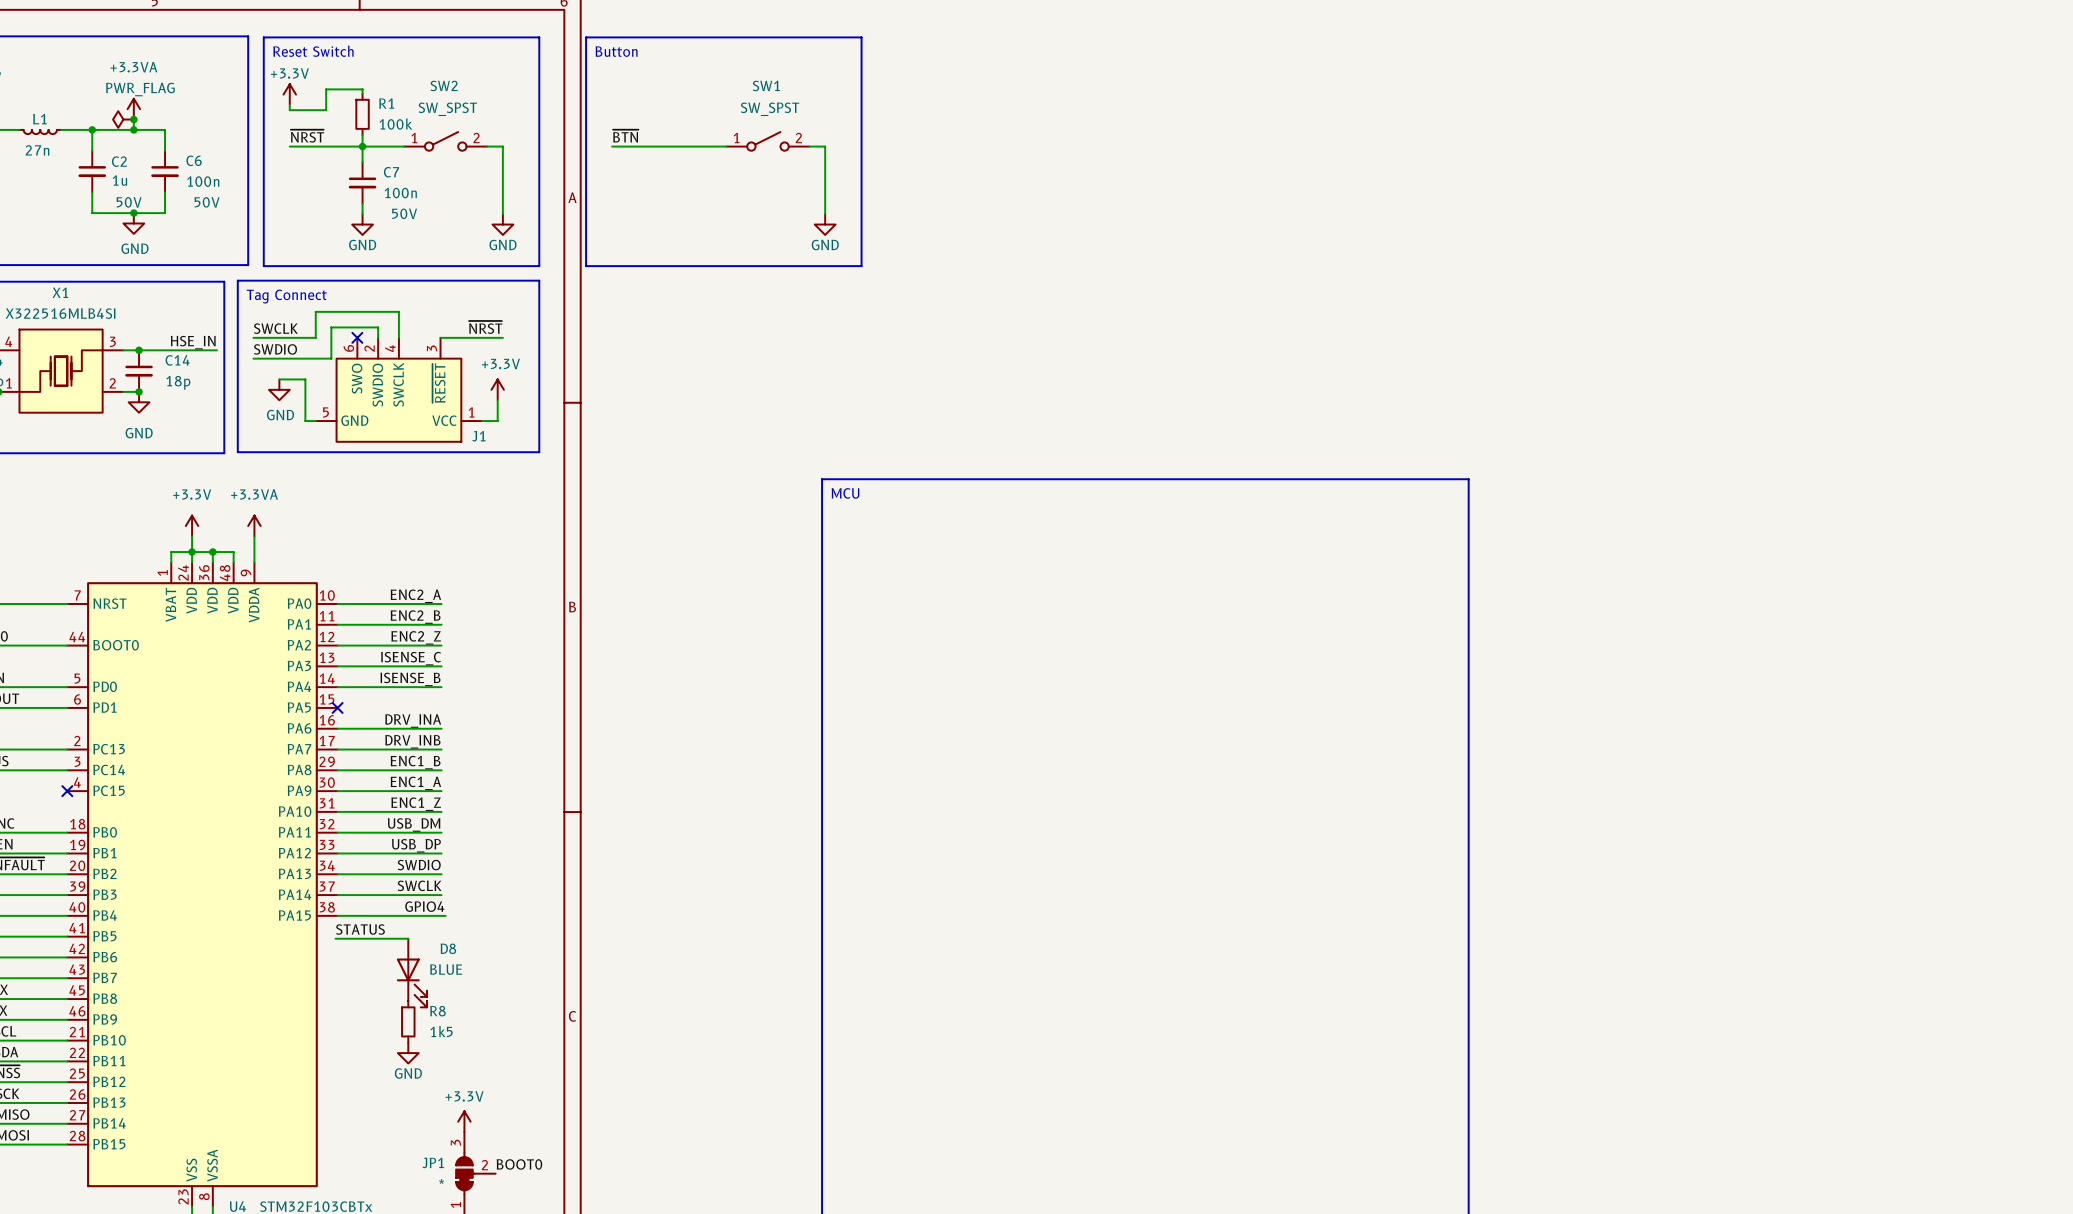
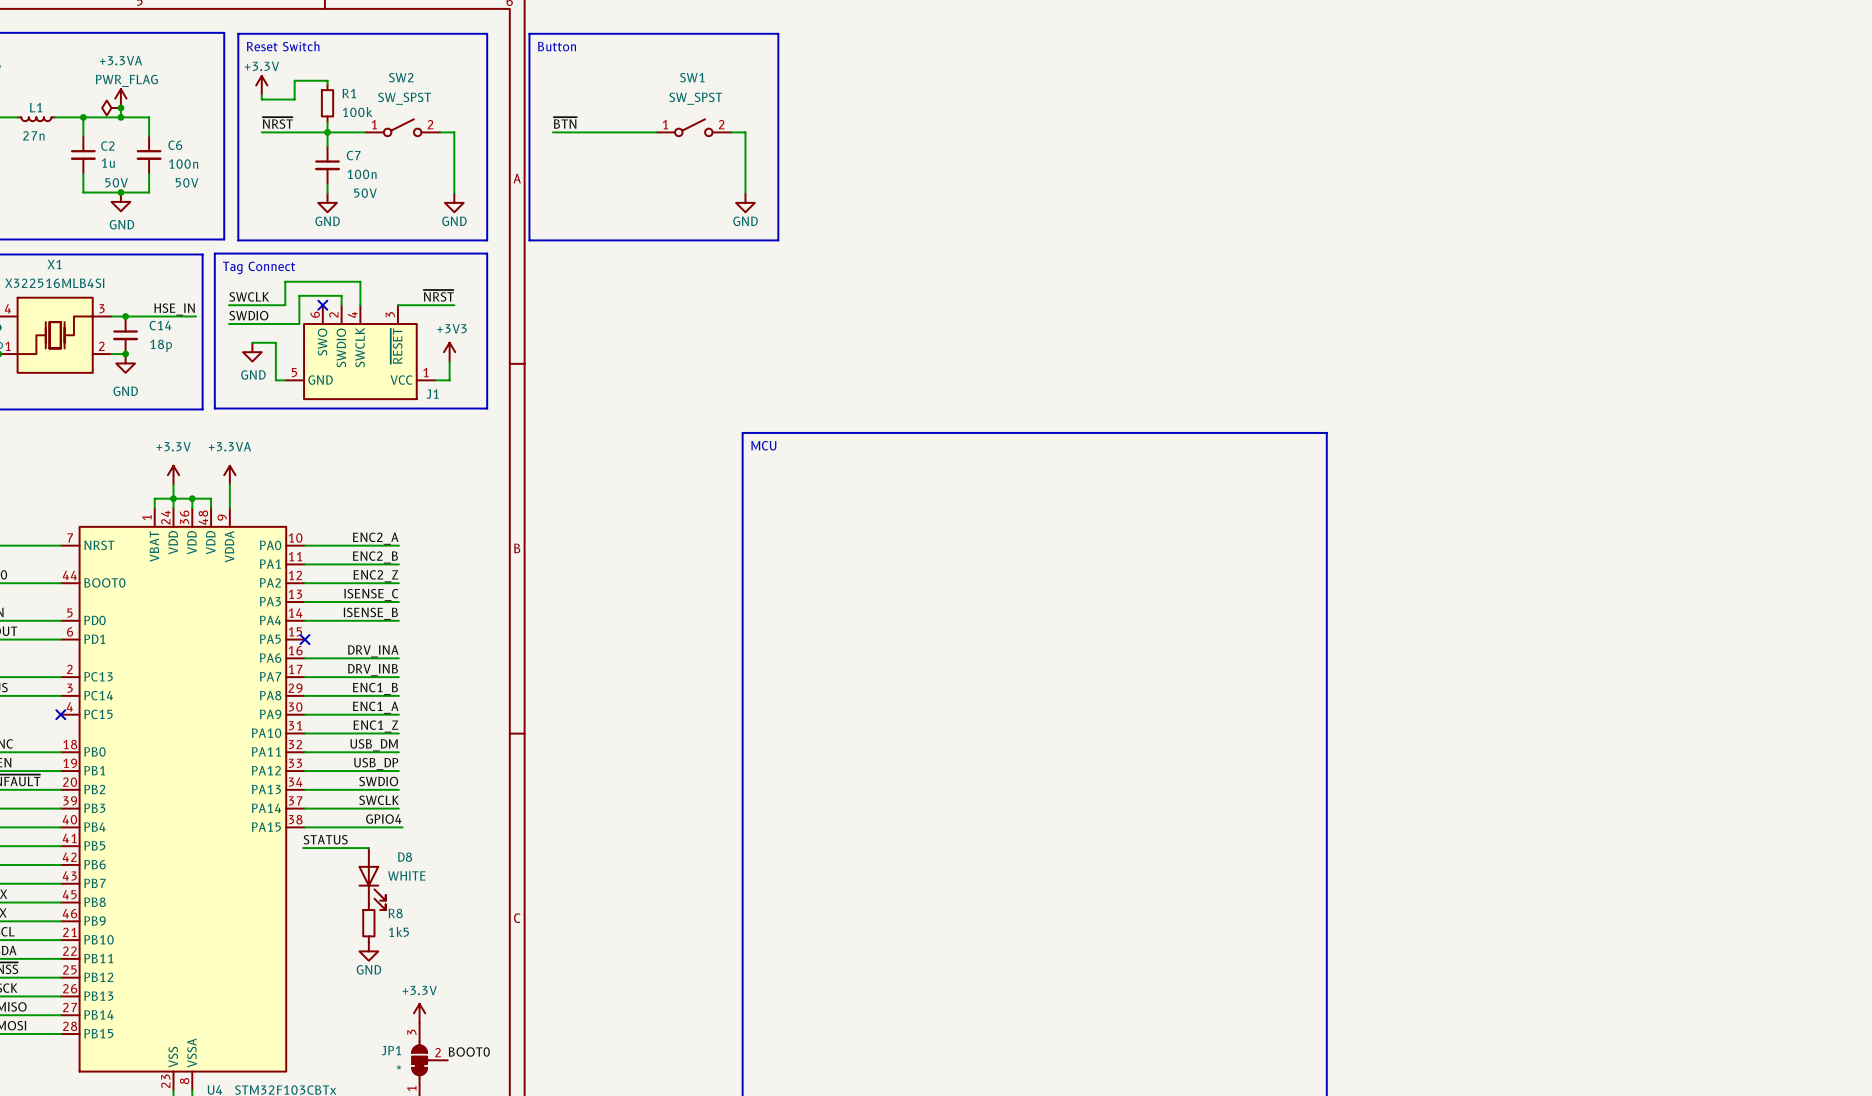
power symbol: +3.3V (497, 389) -> +3V3 (449, 352)
D8 value: BLUE (446, 969) -> WHITE (406, 875)

